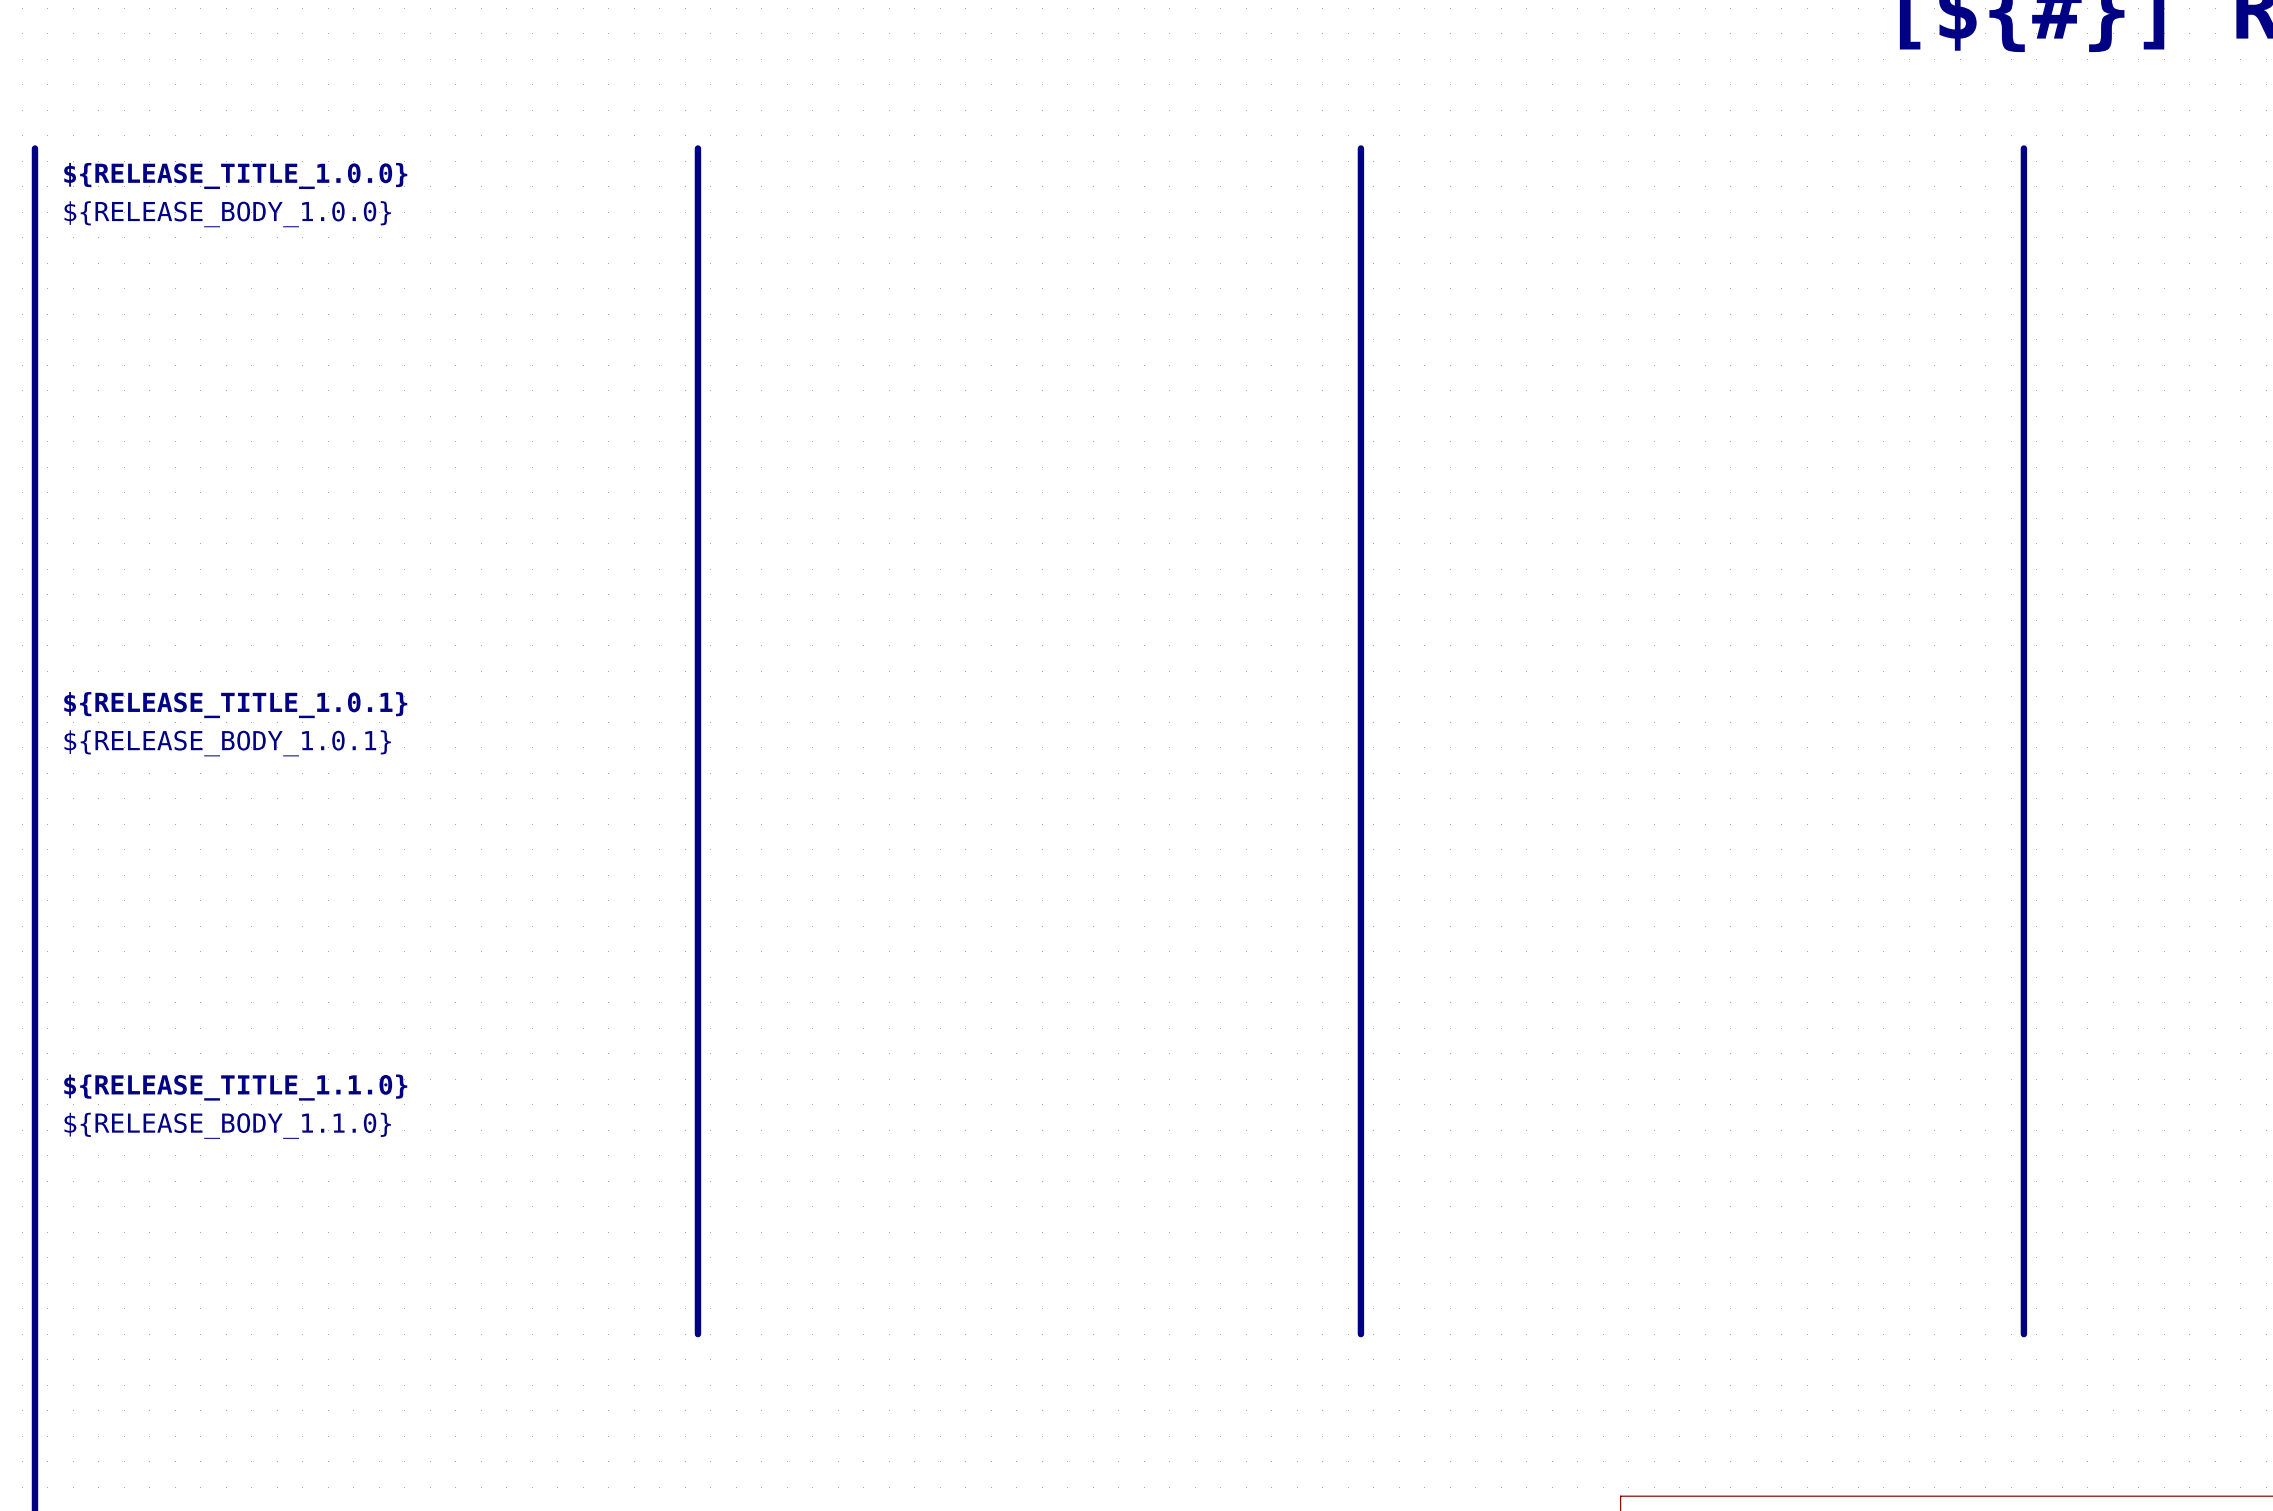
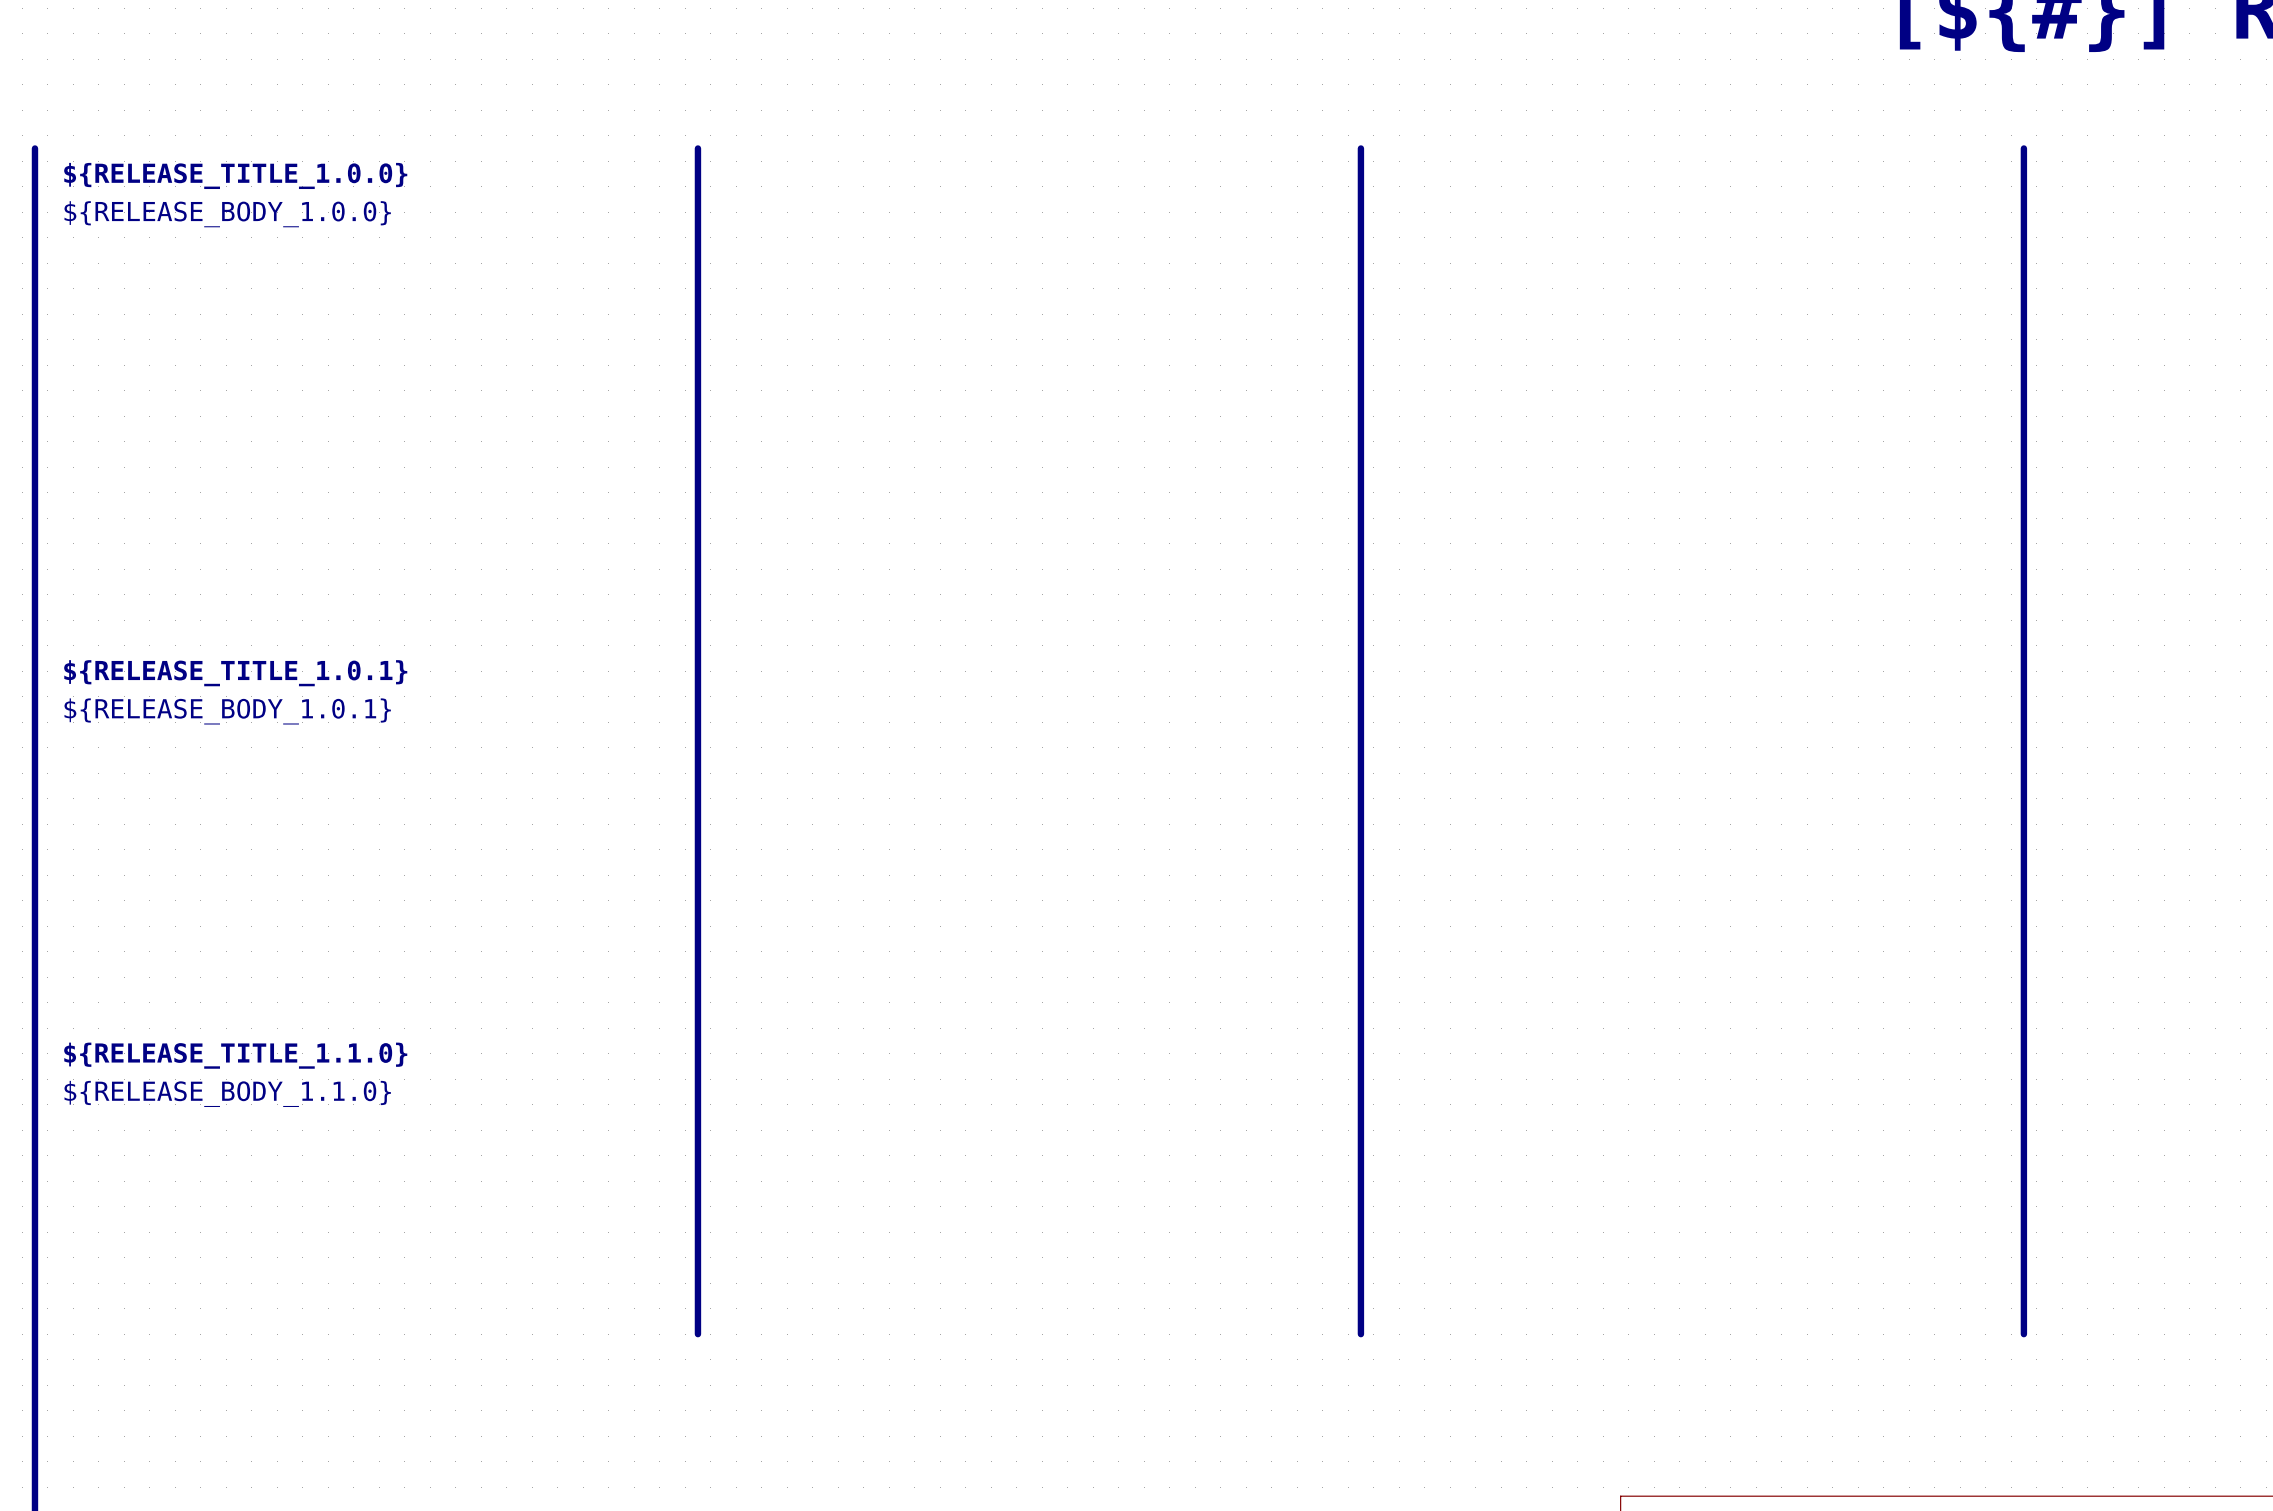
text position: ${RELEASE_TITLE_1.0.1} (235, 705) -> ${RELEASE_TITLE_1.0.1} (235, 673)
text position: ${RELEASE_BODY_1.0.1} (227, 743) -> ${RELEASE_BODY_1.0.1} (227, 711)
text position: ${RELEASE_TITLE_1.1.0} (235, 1087) -> ${RELEASE_TITLE_1.1.0} (235, 1055)
text position: ${RELEASE_BODY_1.1.0} (227, 1125) -> ${RELEASE_BODY_1.1.0} (227, 1093)

